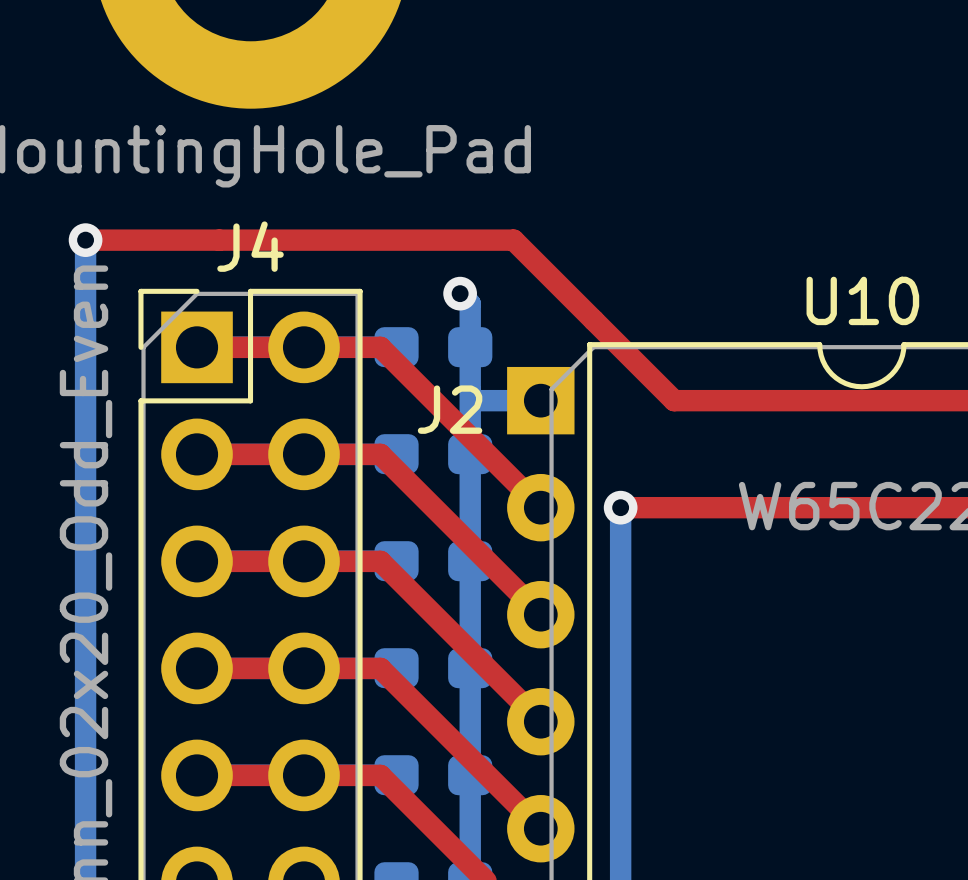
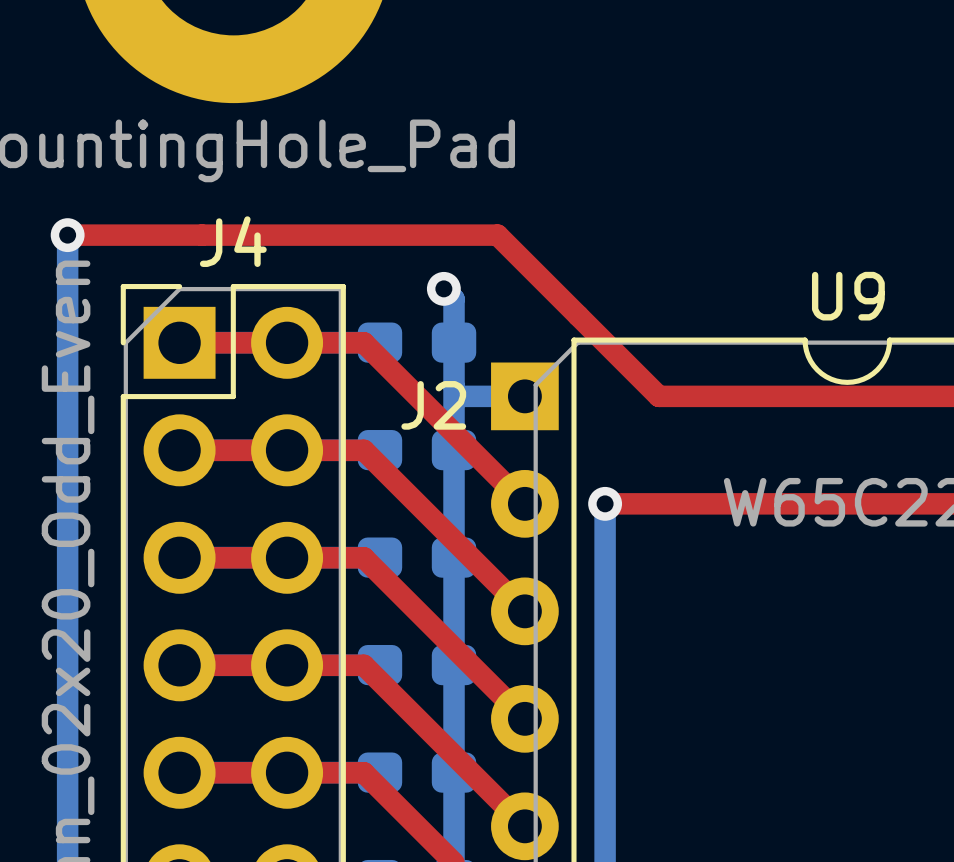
U10 name: U10 (862, 300) -> U9 (848, 296)

